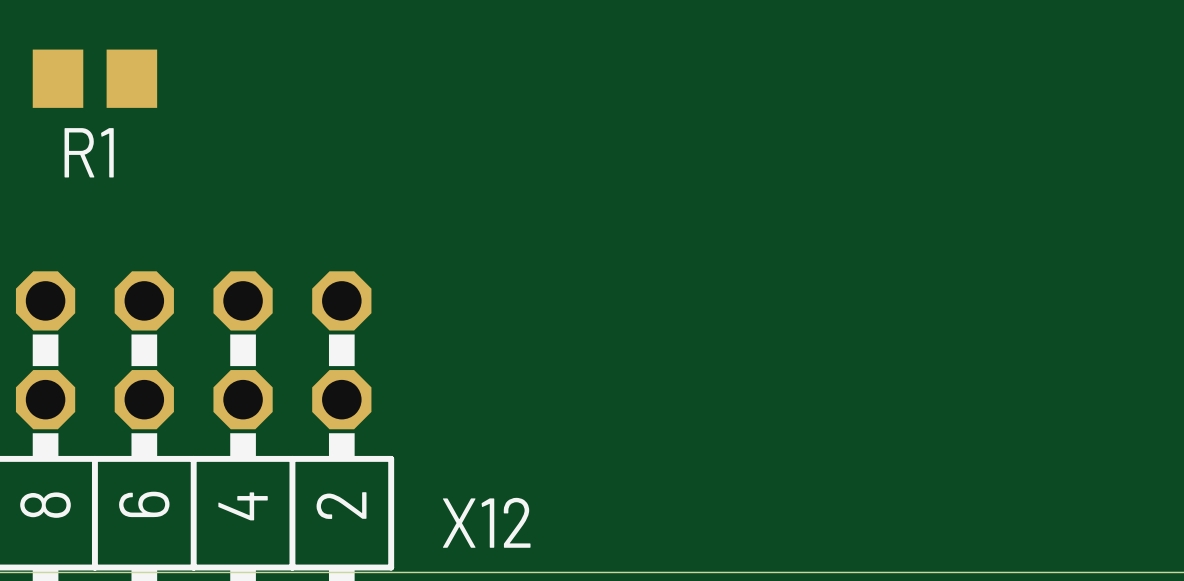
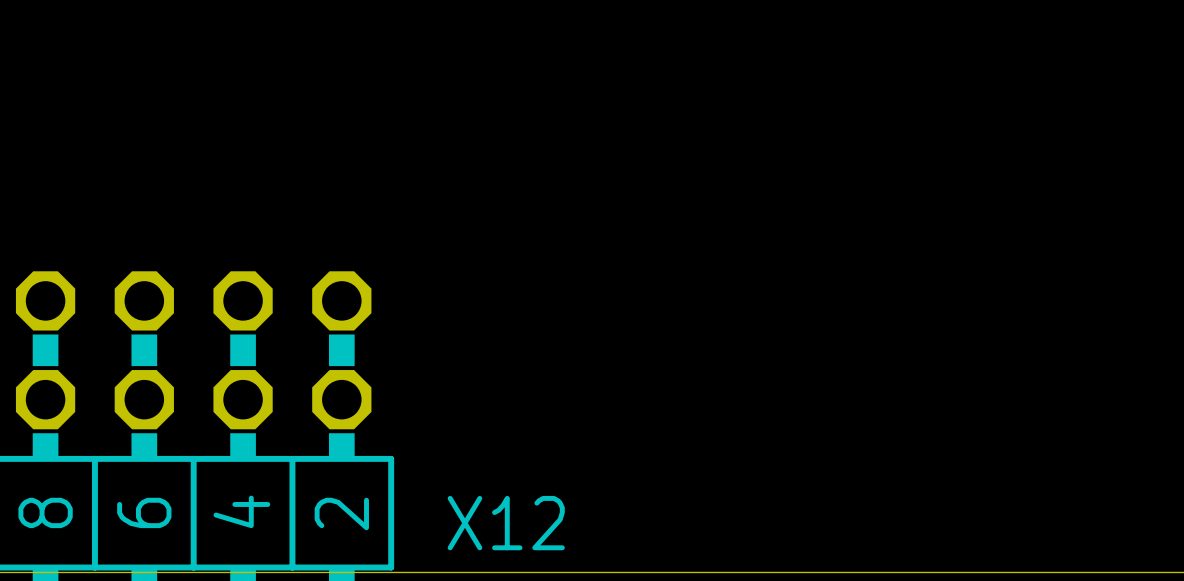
R1: (94, 78) -> none

